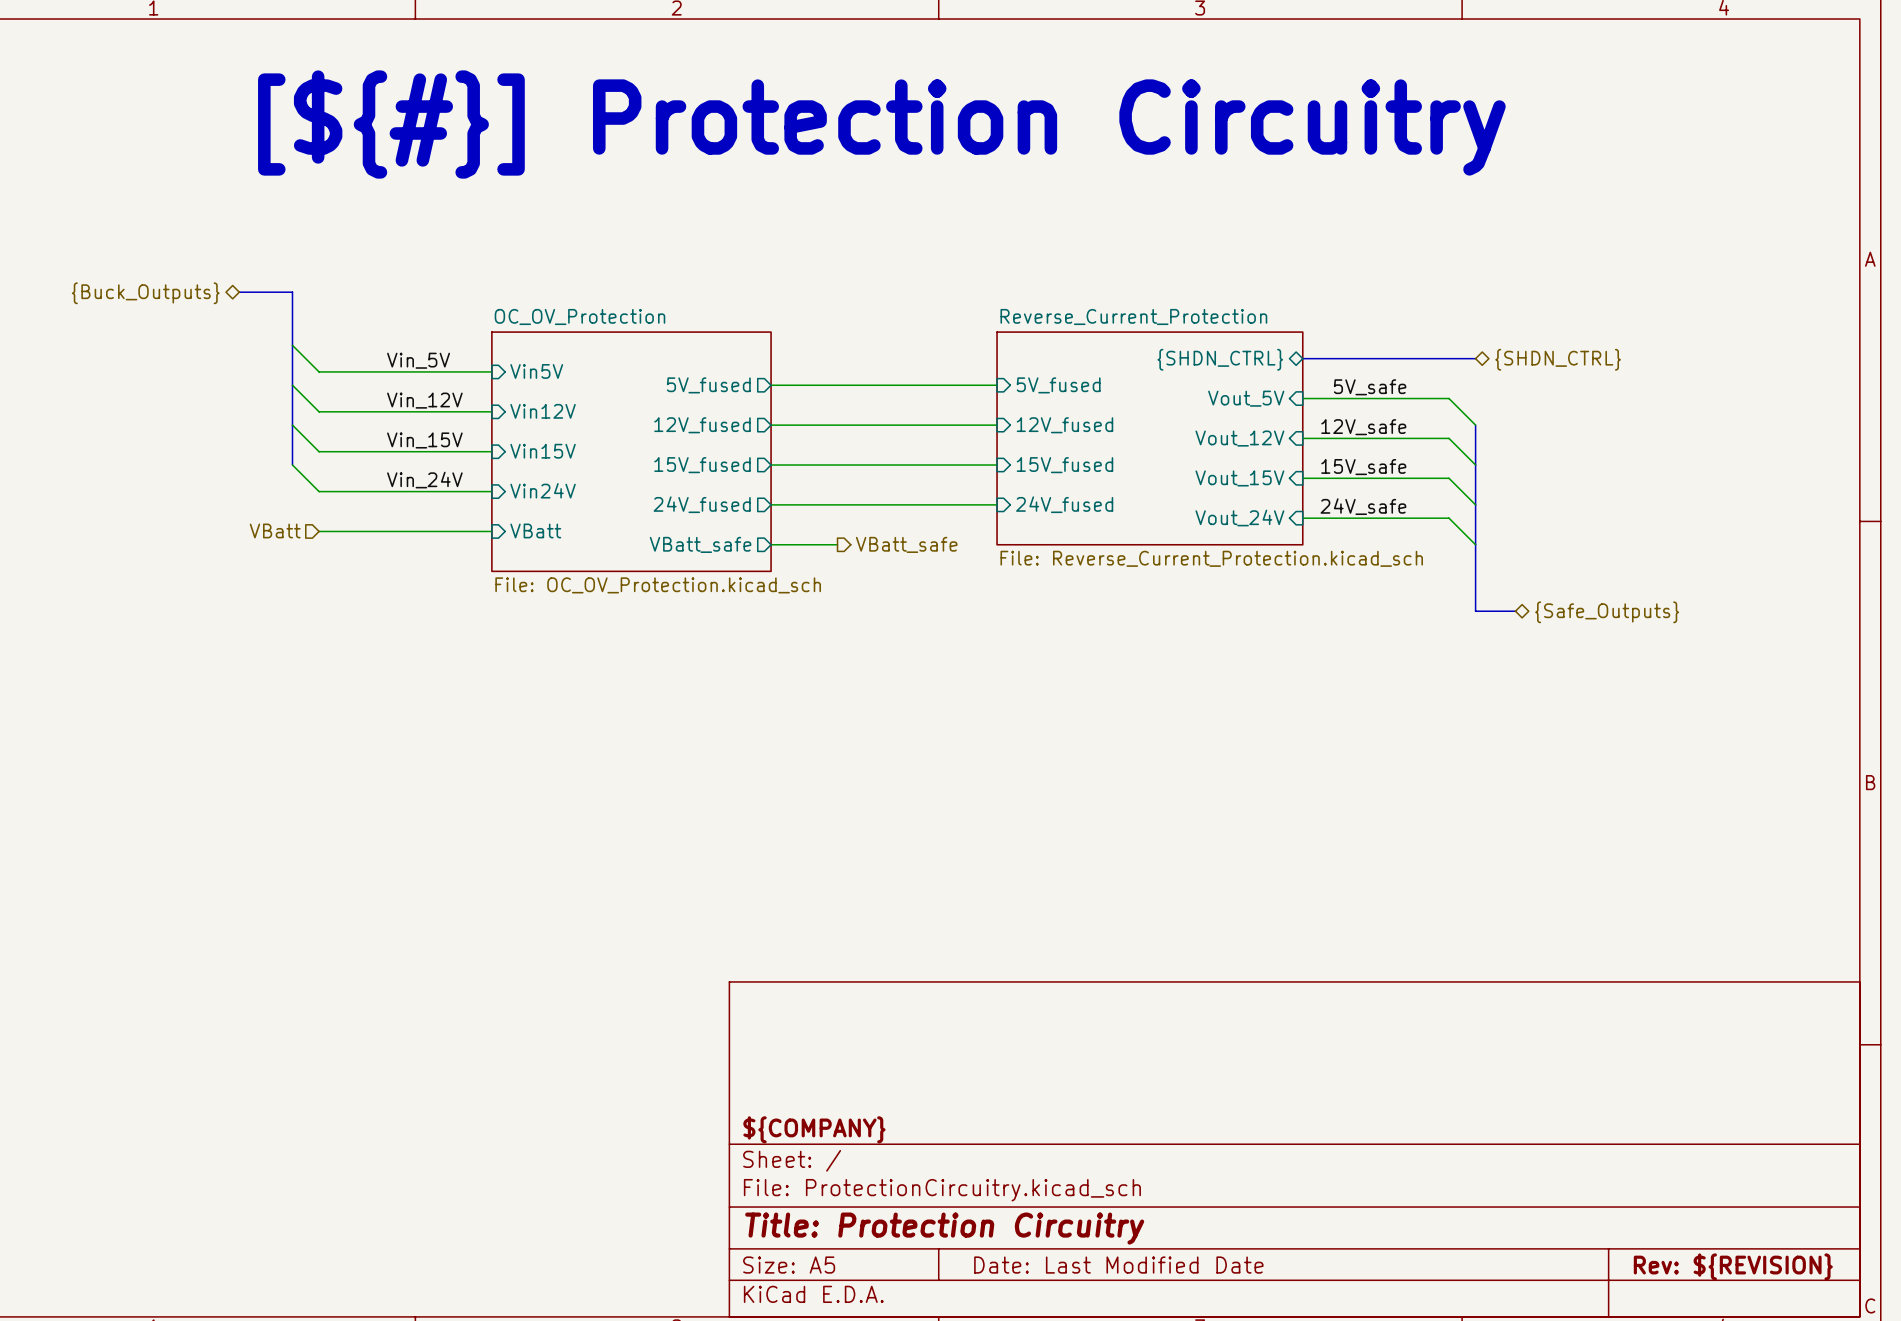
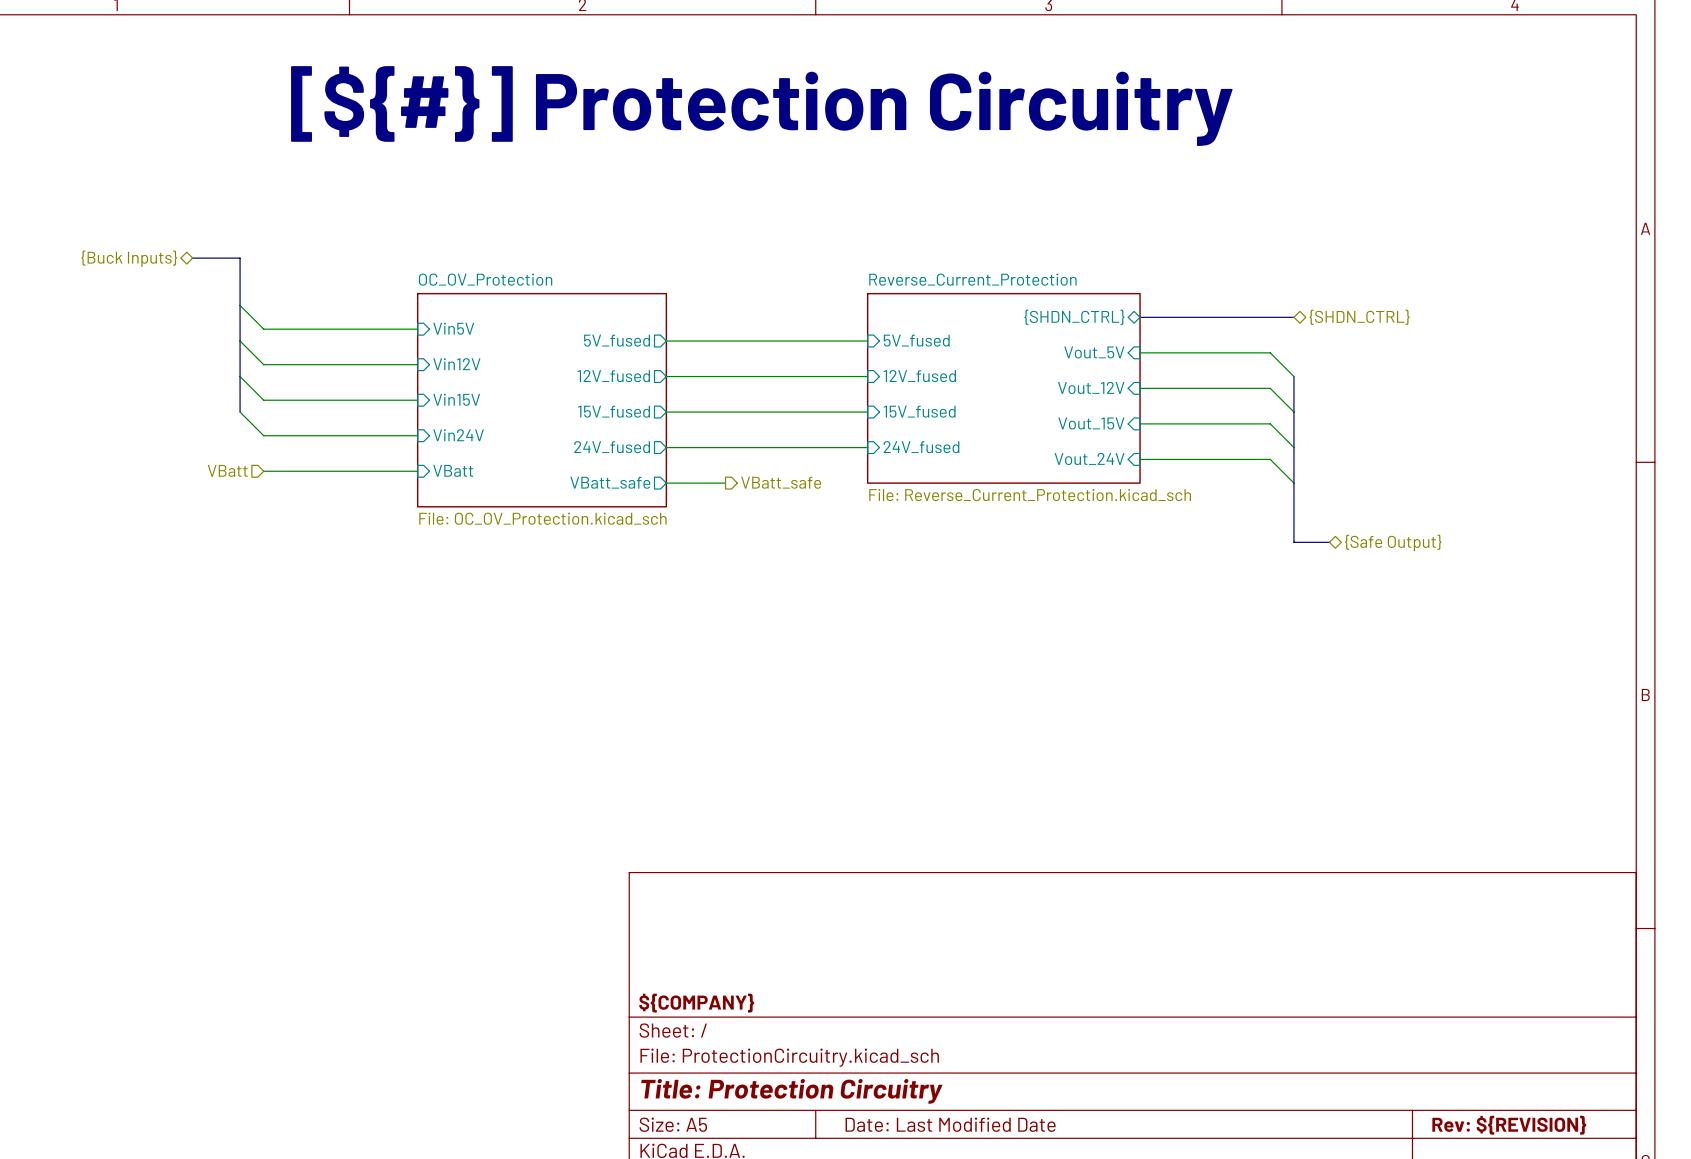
hierarchical label: {Buck_Outputs} (145, 293) -> {Buck Inputs} (129, 258)
label: Vin_5V (418, 360) -> none
label: 5V_safe (1370, 387) -> none
label: Vin_12V (424, 400) -> none
label: 12V_safe (1363, 427) -> none
label: Vin_15V (424, 440) -> none
label: 15V_safe (1363, 467) -> none
label: Vin_24V (424, 480) -> none
label: 24V_safe (1363, 506) -> none
hierarchical label: {Safe_Outputs} (1607, 612) -> {Safe Output} (1393, 542)

